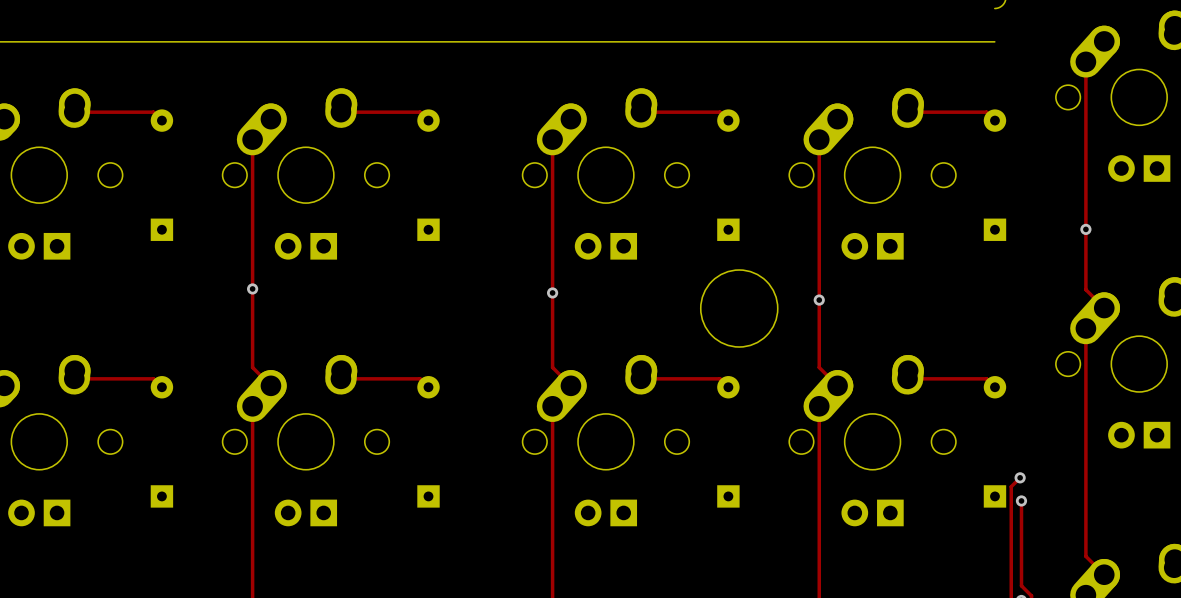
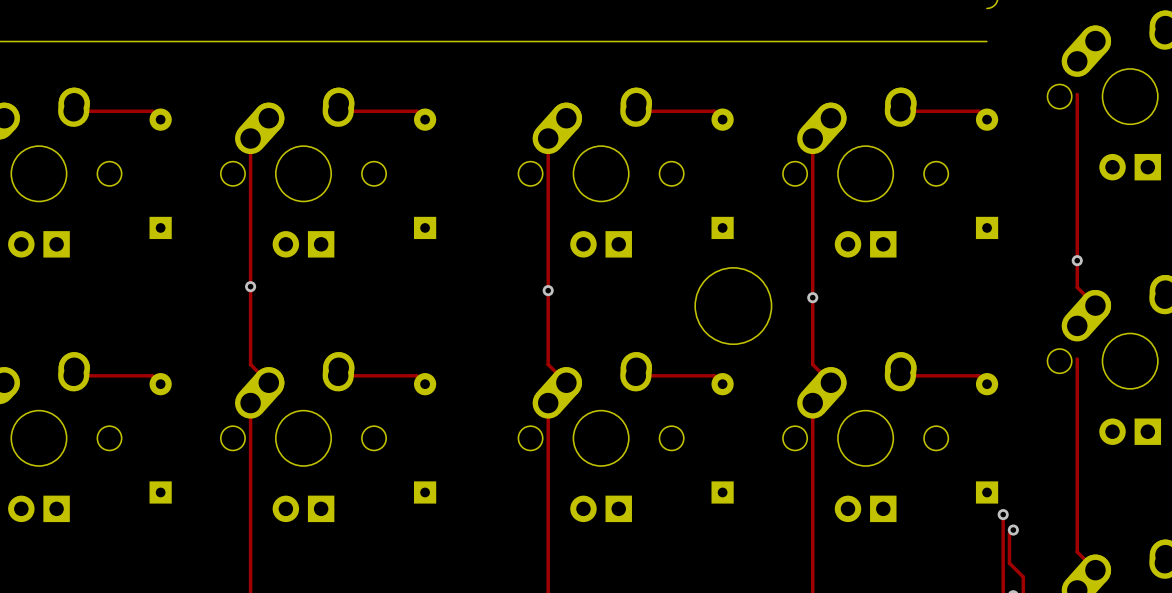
track: (1085, 61) (1085, 95) -> none
via position: (1085, 229) -> (1077, 260)
track: (1085, 328) (1085, 361) -> none
track: (1020, 477) (1011, 486) (1011, 518) -> none
via: (1020, 477) -> none
track: (1020, 500) (1021, 585) (1031, 595) -> (1013, 530) (1009, 533) (1009, 563) (1023, 577) (1023, 591)
via: (1021, 500) -> none
via: none -> (1003, 514)
via: none -> (1013, 530)

